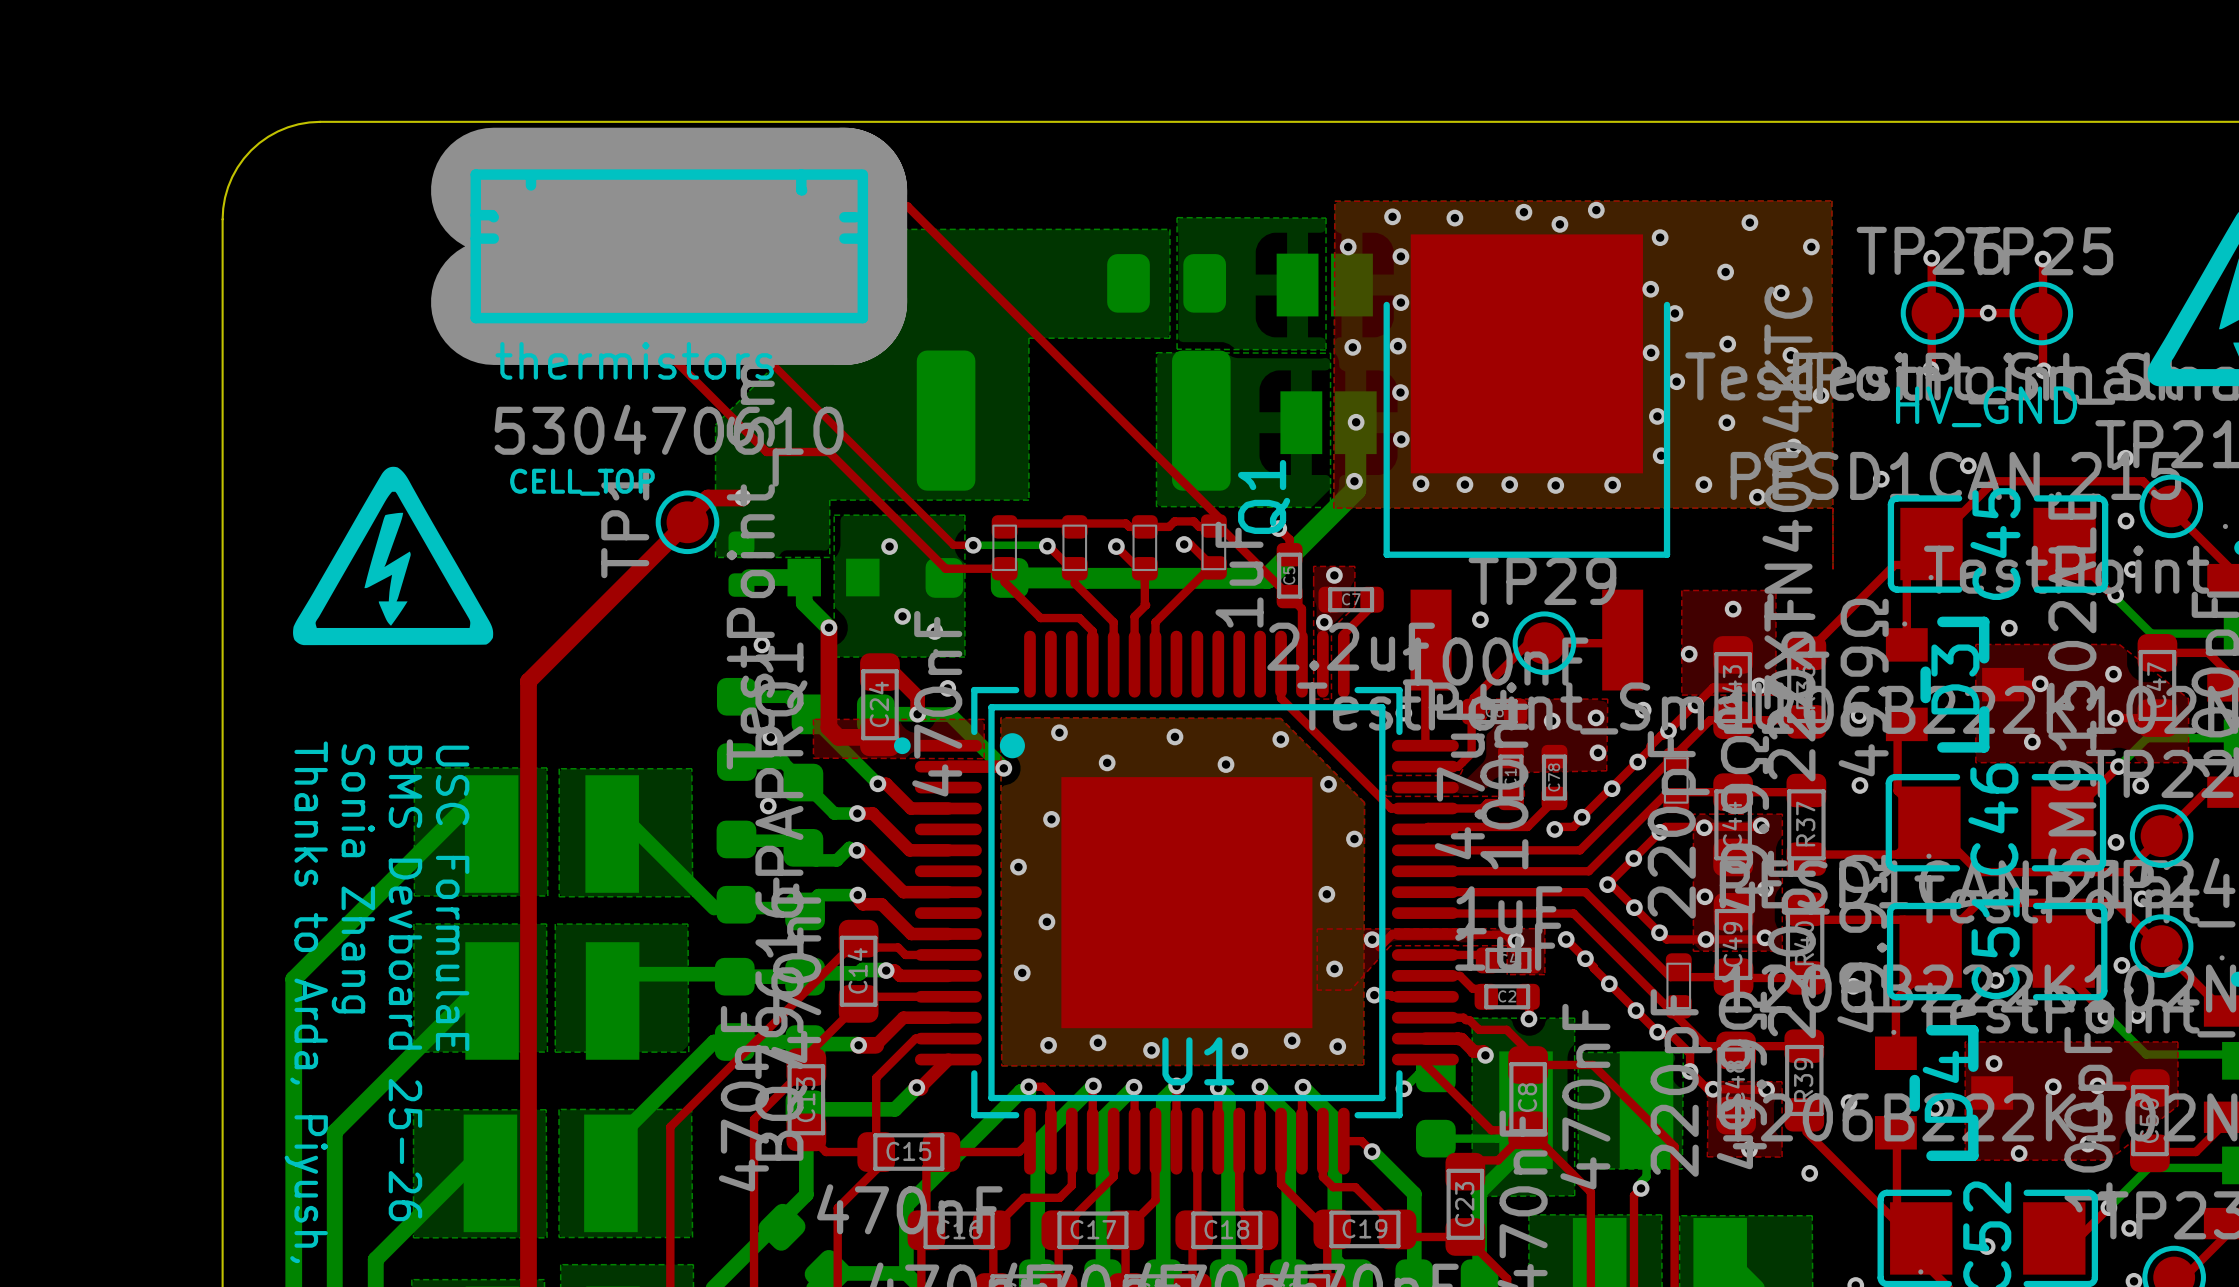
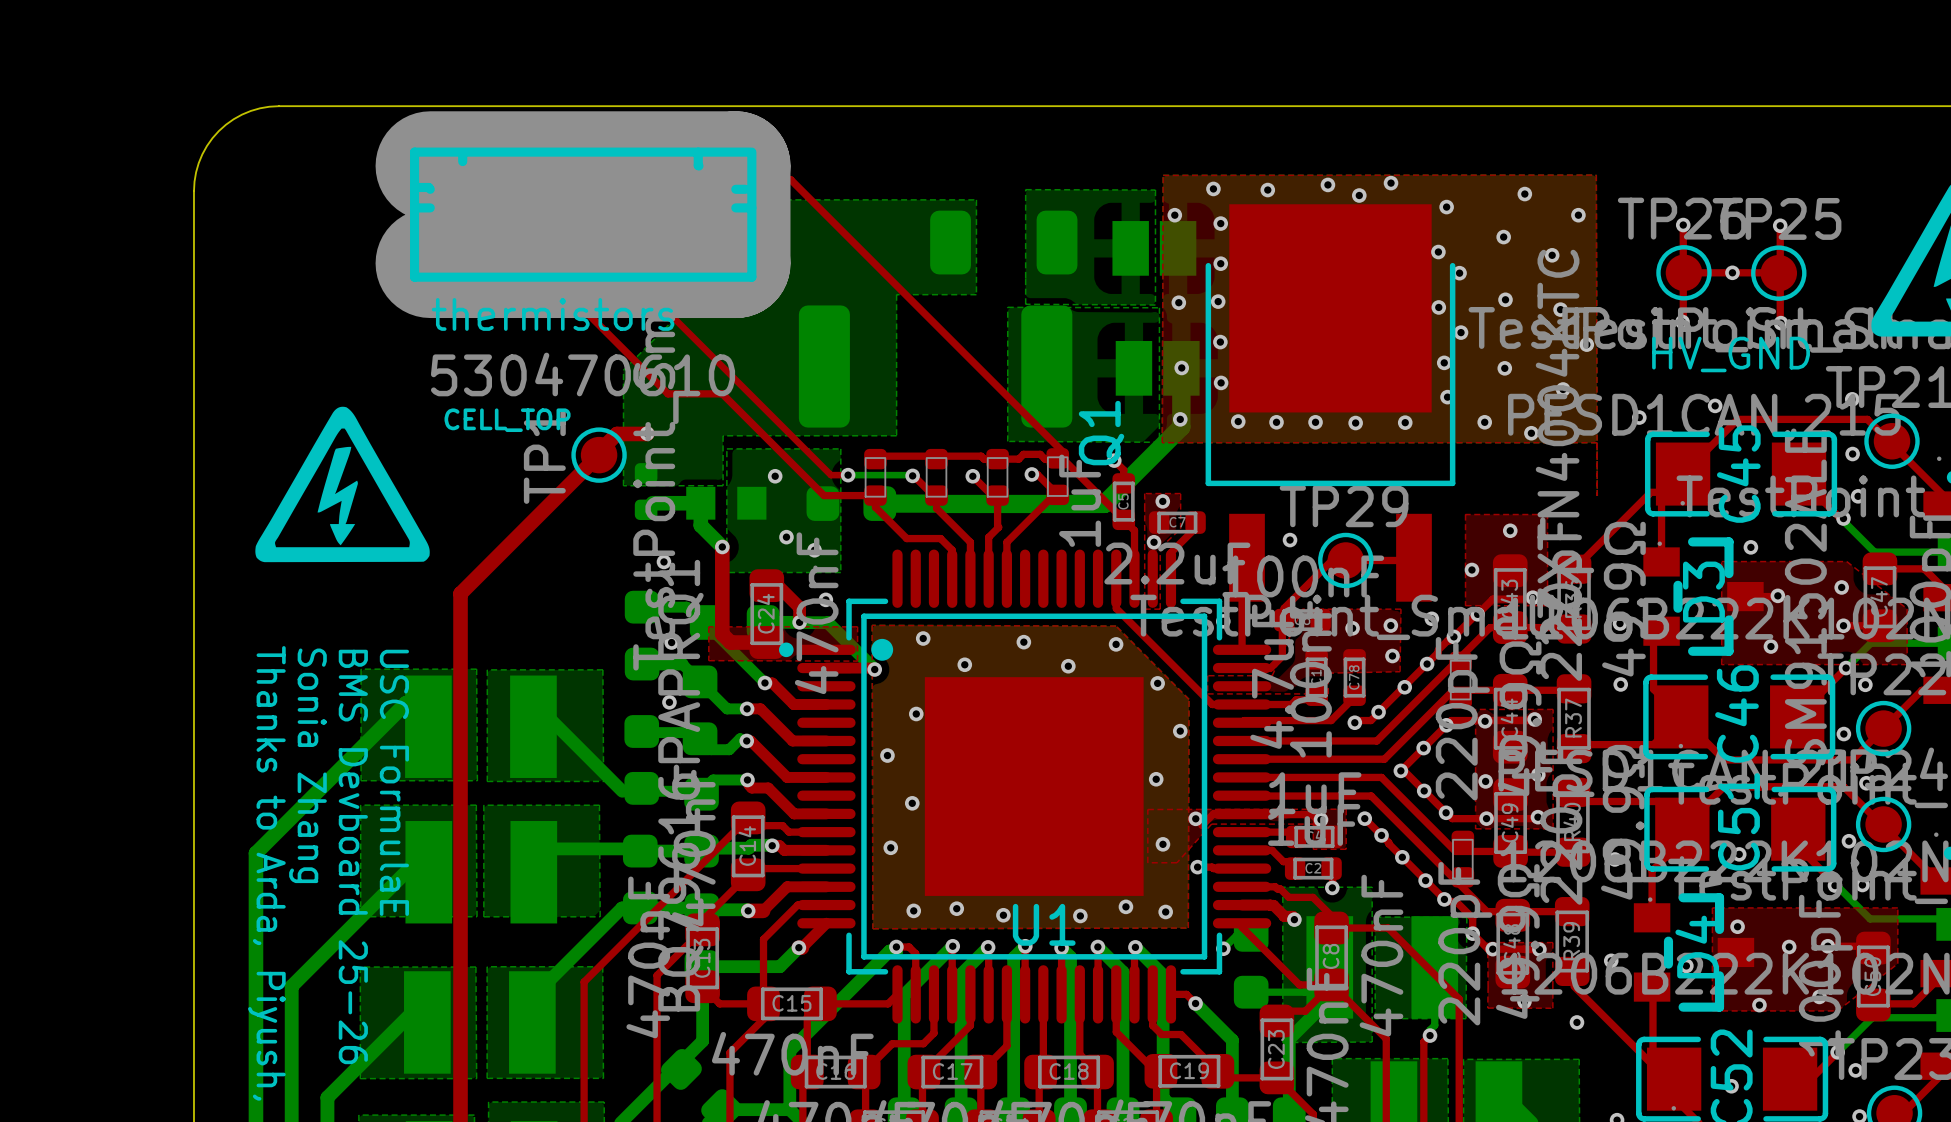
bottom zone outline: (1120, 229) (1169, 229) (1169, 338) (1120, 338) -> (976, 199) (976, 294)
part footprint: [1107, 254, 1227, 313] -> [930, 210, 1078, 275]

